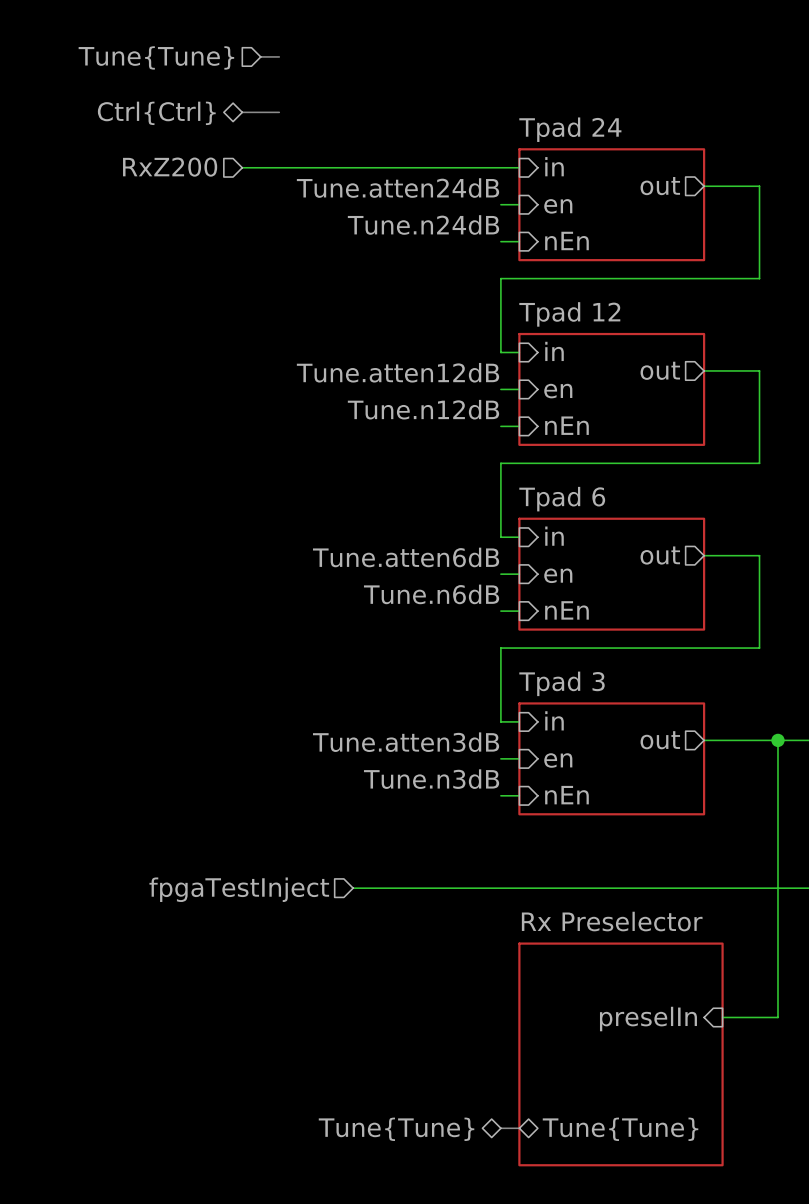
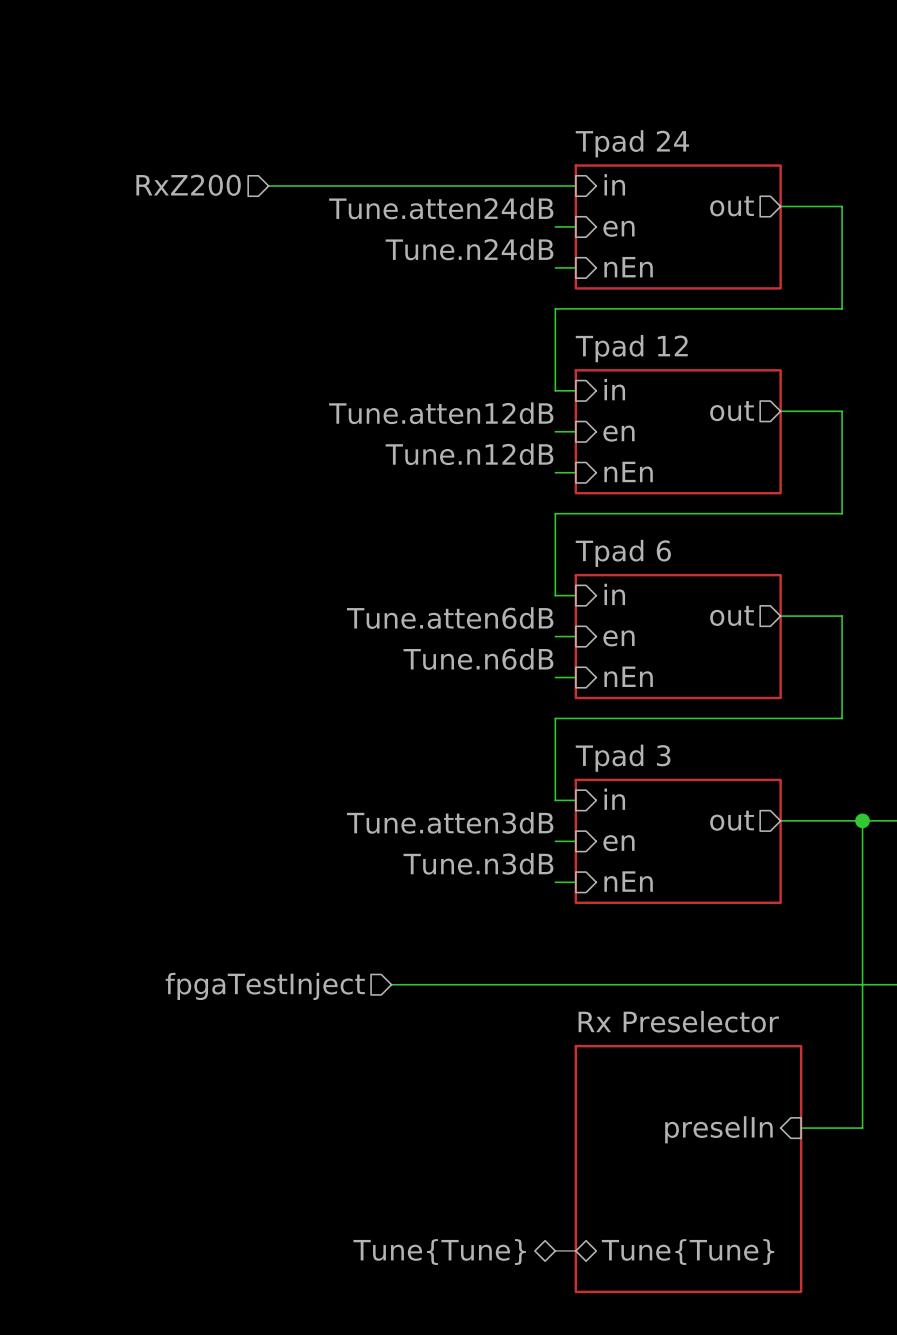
bus: (260, 56) (279, 56) -> none
hierarchical label: Tune{Tune} (156, 57) -> none
bus: (242, 112) (279, 112) -> none
hierarchical label: Ctrl{Ctrl} (156, 113) -> none

